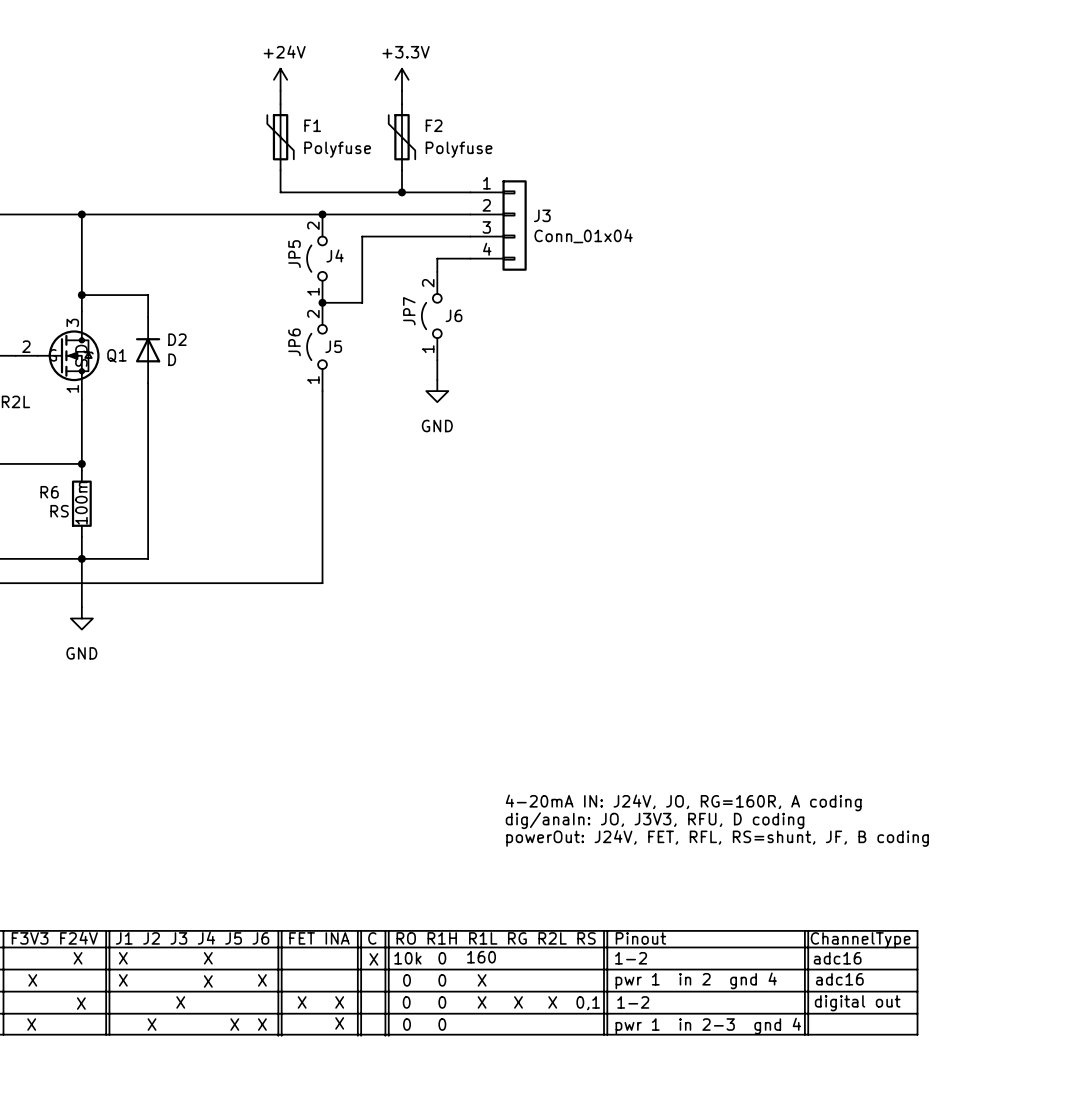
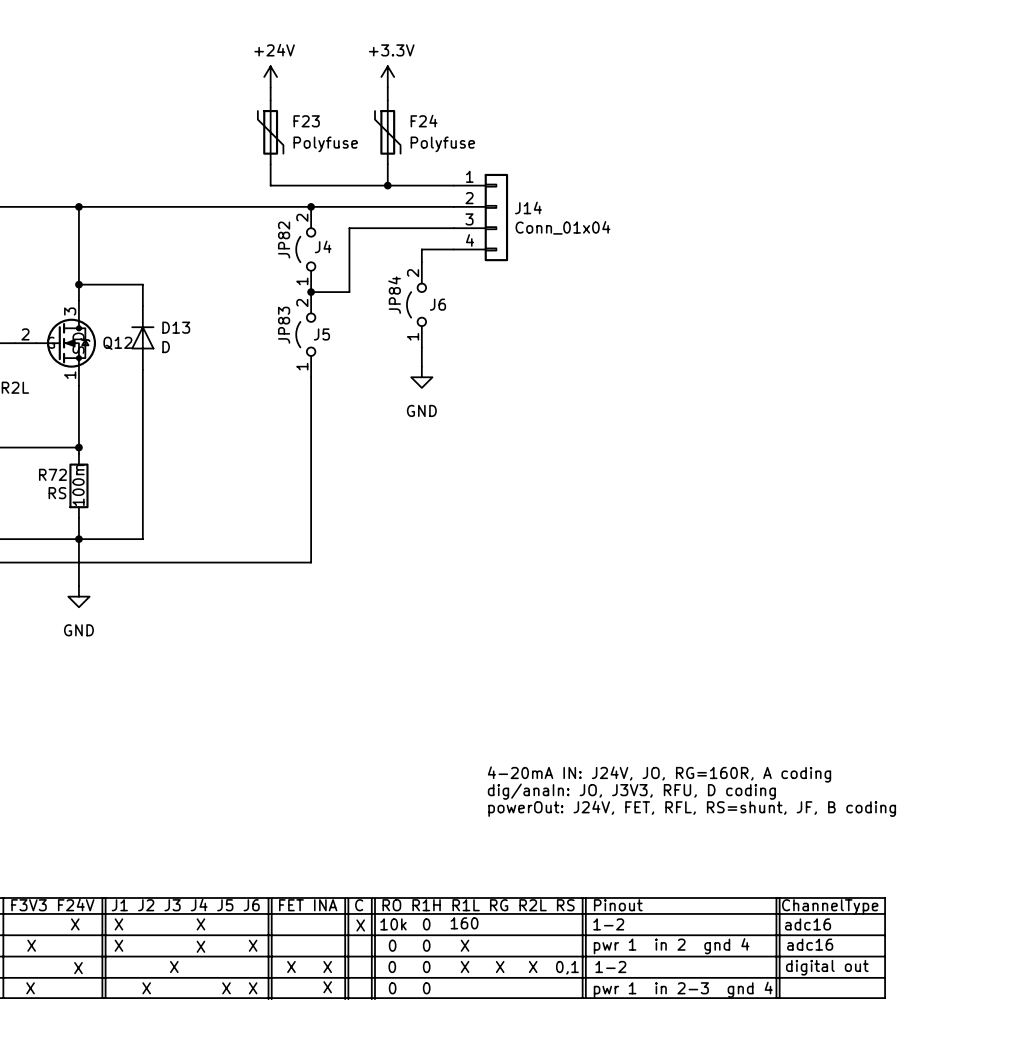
F1 name: F1 (312, 125) -> F23 (306, 121)
F2 name: F2 (434, 125) -> F24 (424, 121)
J3 name: J3 (542, 215) -> J14 (528, 207)
JP5 name: JP5 (294, 254) -> JP82 (284, 240)
JP7 name: JP7 (409, 311) -> JP84 (394, 295)
JP6 name: JP6 (294, 342) -> JP83 (284, 325)
D2: D (148, 350) -> none
D13: none -> D (142, 337)
Q1 name: Q1 (116, 355) -> Q12 (117, 343)
R6 name: R6 (49, 492) -> R72 (52, 474)

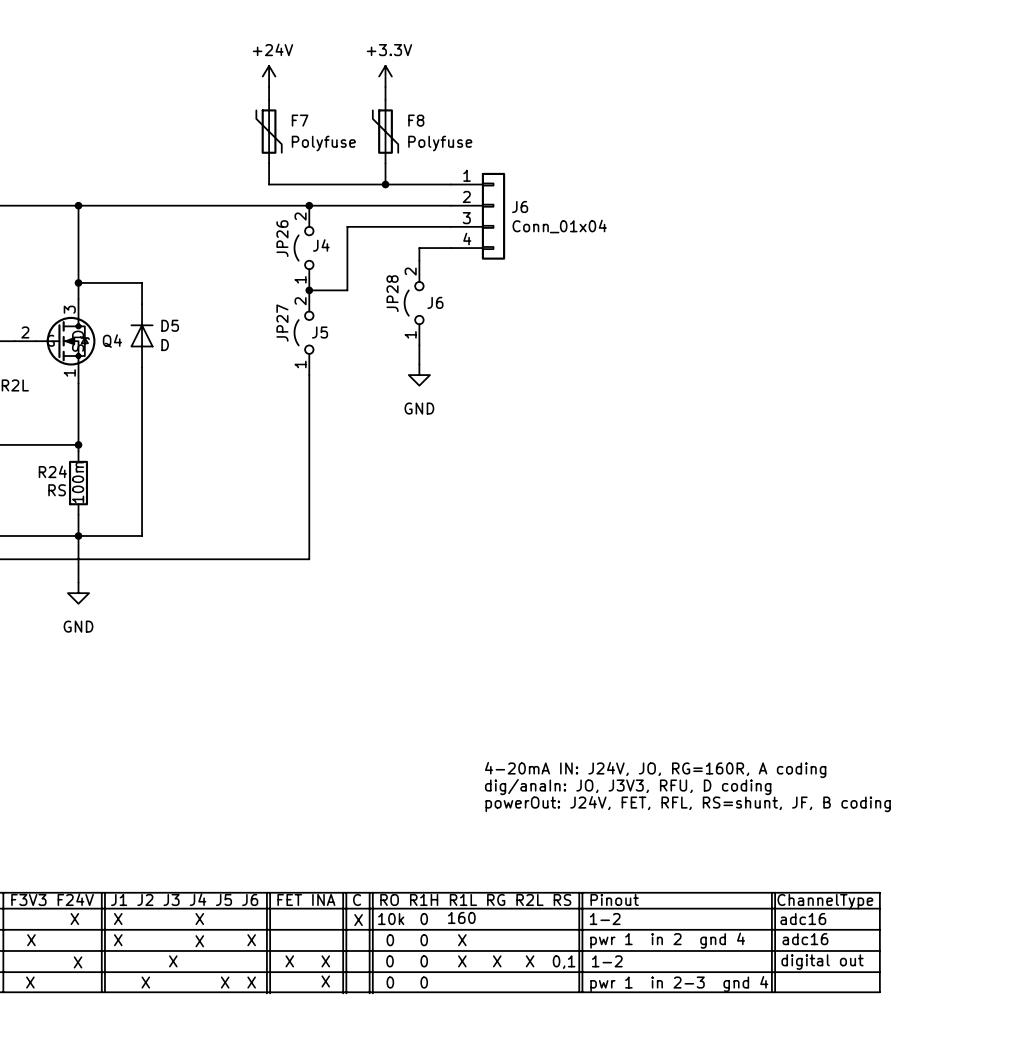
F23 name: F23 (306, 121) -> F7 (300, 120)
F24 name: F24 (424, 121) -> F8 (416, 120)
J14 name: J14 (528, 207) -> J6 (520, 206)
JP82 name: JP82 (284, 240) -> JP26 (282, 238)
JP84 name: JP84 (394, 295) -> JP28 (392, 293)
JP83 name: JP83 (284, 325) -> JP27 (282, 323)
D13 name: D13 (176, 327) -> D5 (170, 325)
Q12 name: Q12 (117, 343) -> Q4 (112, 341)
R72 name: R72 (52, 474) -> R24 (52, 471)

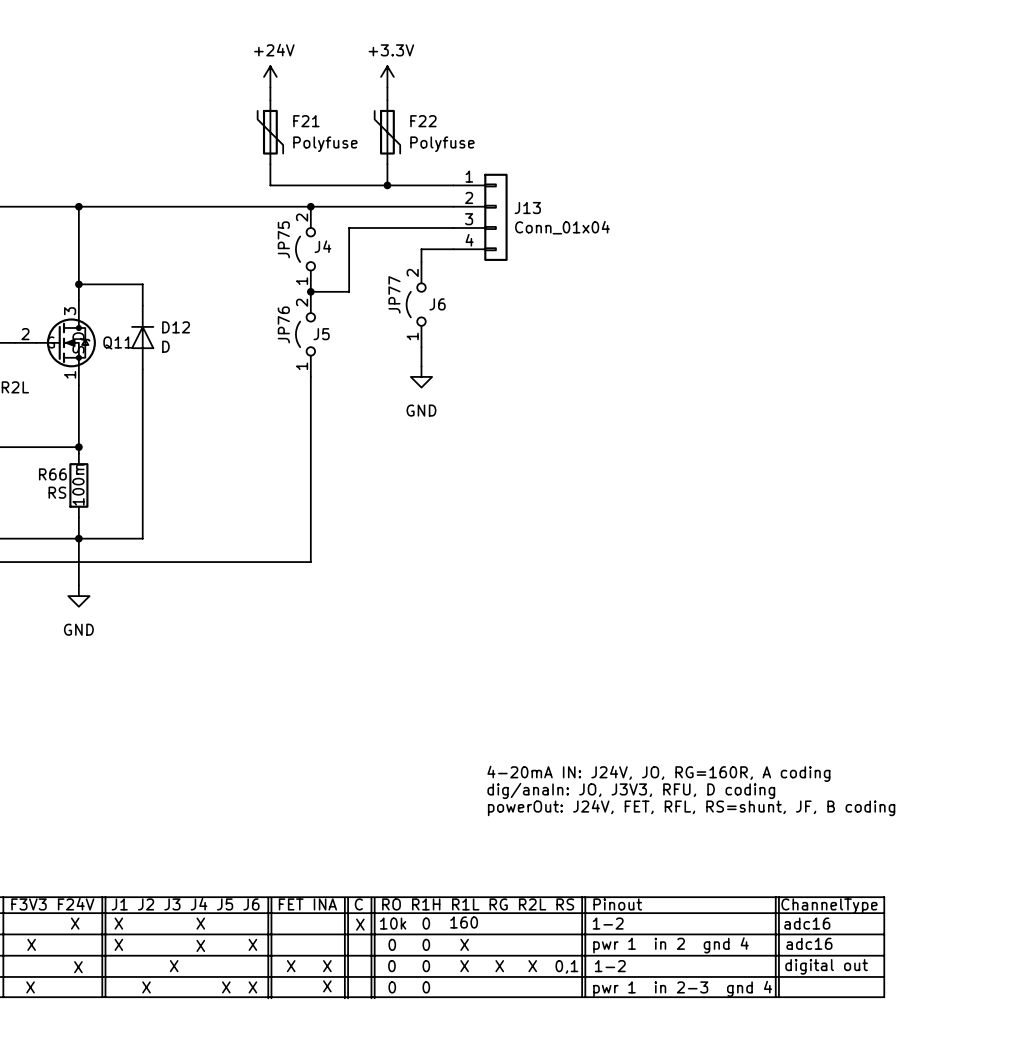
F7 name: F7 (300, 120) -> F21 (306, 121)
F8 name: F8 (416, 120) -> F22 (423, 121)
J6 name: J6 (520, 206) -> J13 (527, 208)
JP26 name: JP26 (282, 238) -> JP75 (283, 239)
JP28 name: JP28 (392, 293) -> JP77 (394, 294)
JP27 name: JP27 (282, 323) -> JP76 (283, 324)
D5 name: D5 (170, 325) -> D12 (176, 327)
Q4 name: Q4 (112, 341) -> Q11 (117, 343)
R24 name: R24 (52, 471) -> R66 (52, 474)

